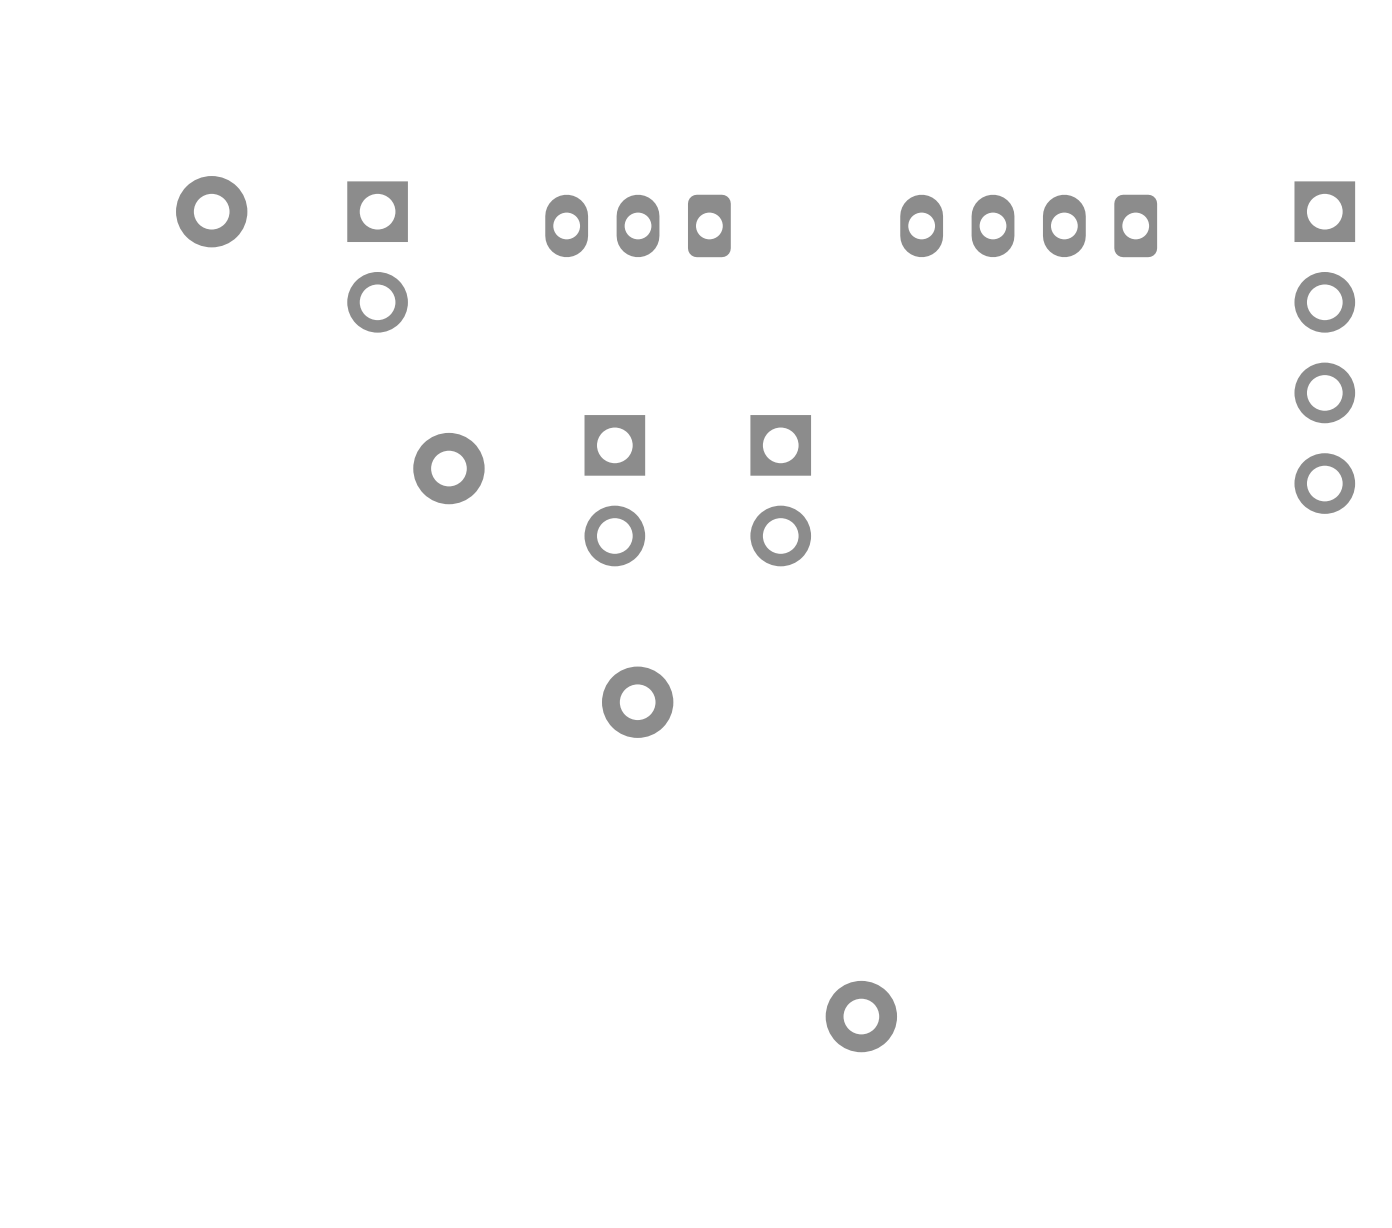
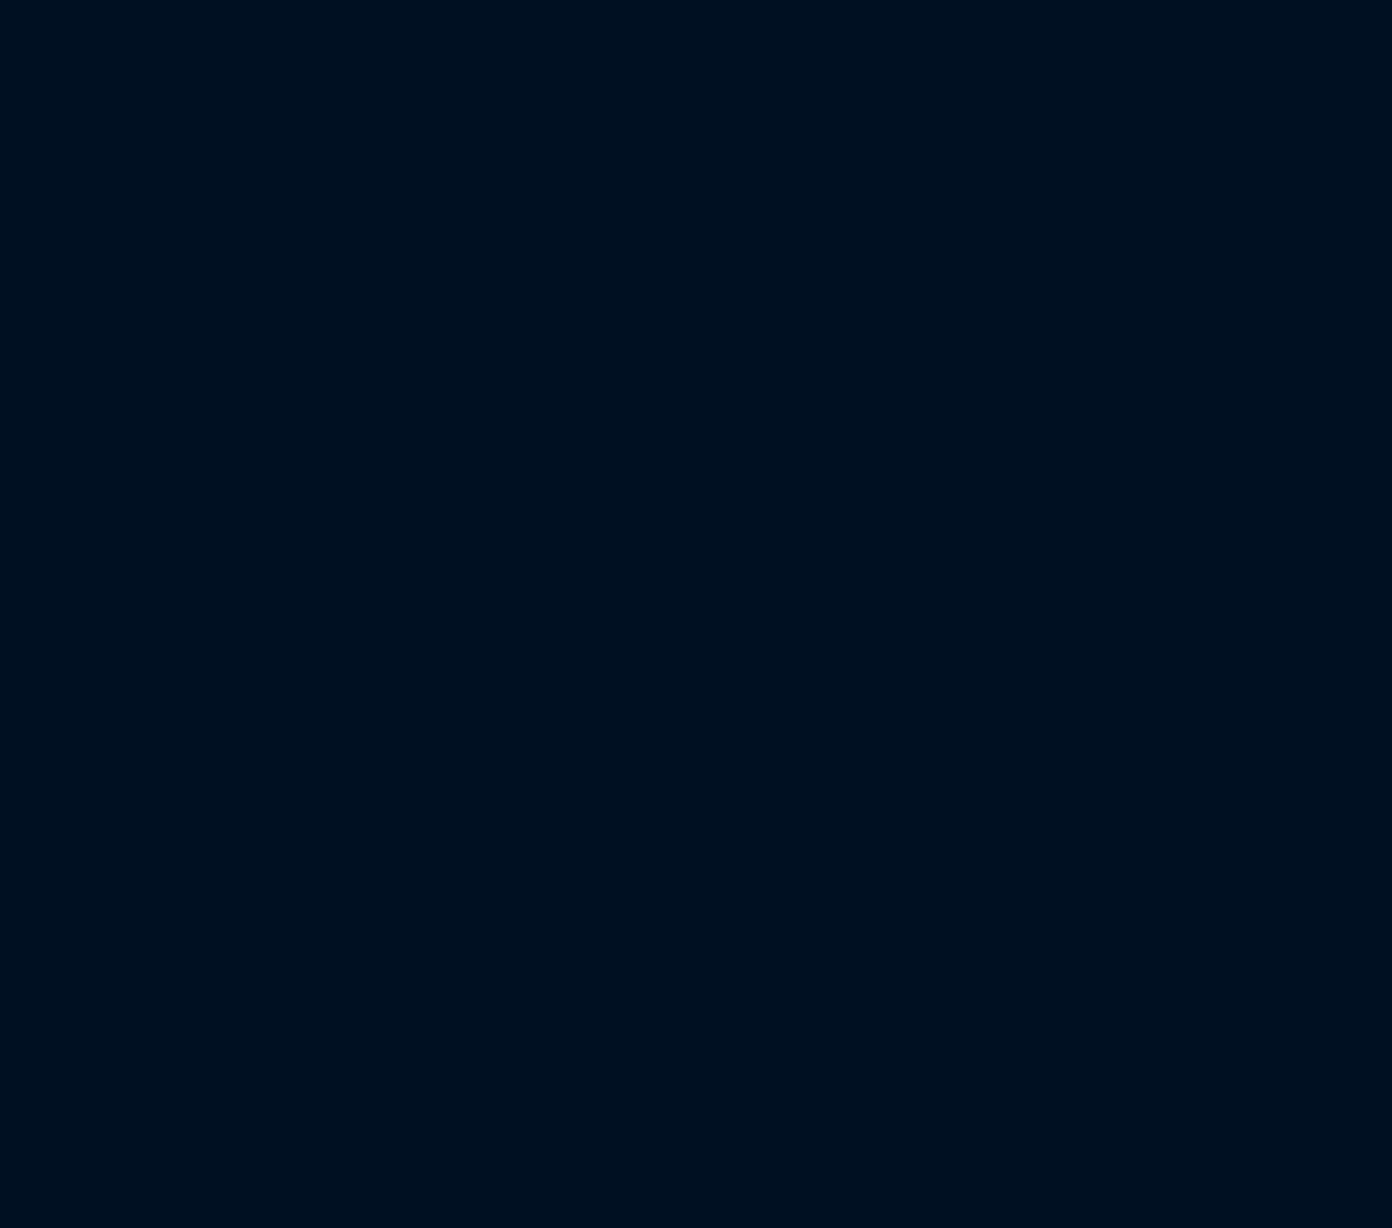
part: (211, 211) -> none
part: (638, 225) -> none
part: (1028, 225) -> none
part: (377, 257) -> none
part: (1324, 347) -> none
part: (448, 468) -> none
part: (614, 490) -> none
part: (780, 490) -> none
part: (637, 702) -> none
part: (861, 1016) -> none

